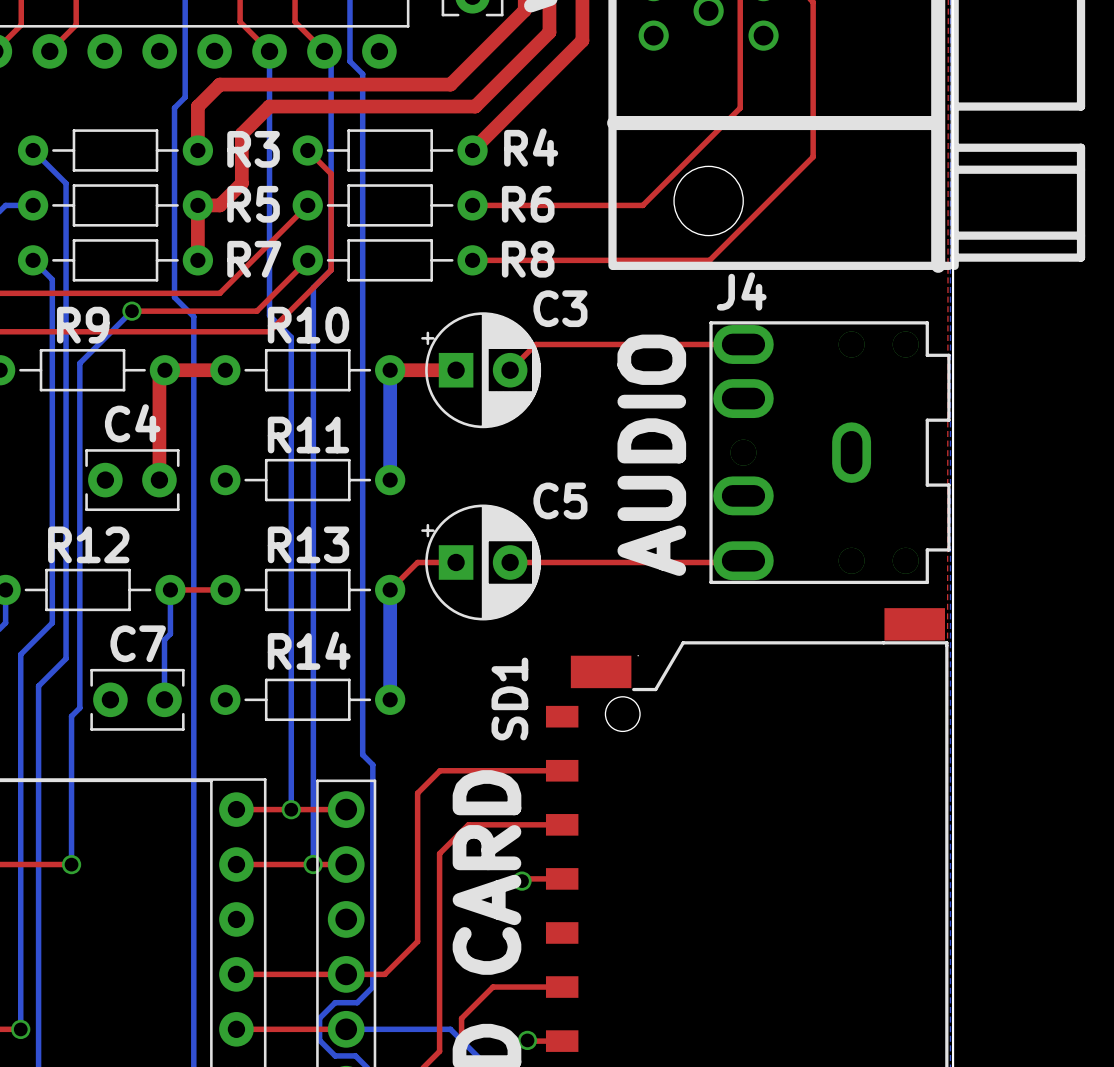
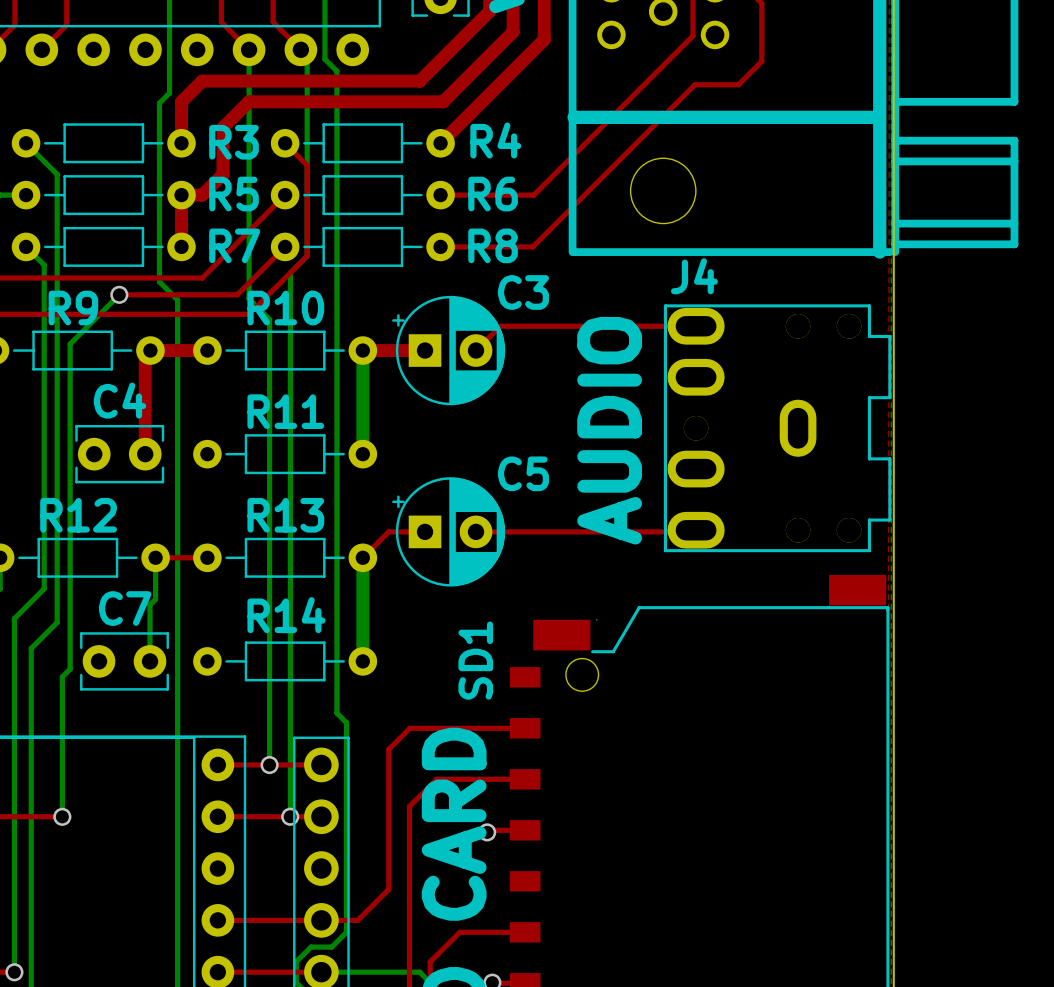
top track: (740, 36) (740, 108) (642, 205) (571, 205) -> (693, 35) (533, 195)
top track: (813, 63) (813, 156) (709, 260) (570, 260) -> (761, 61) (738, 84) (694, 84) (532, 246)

